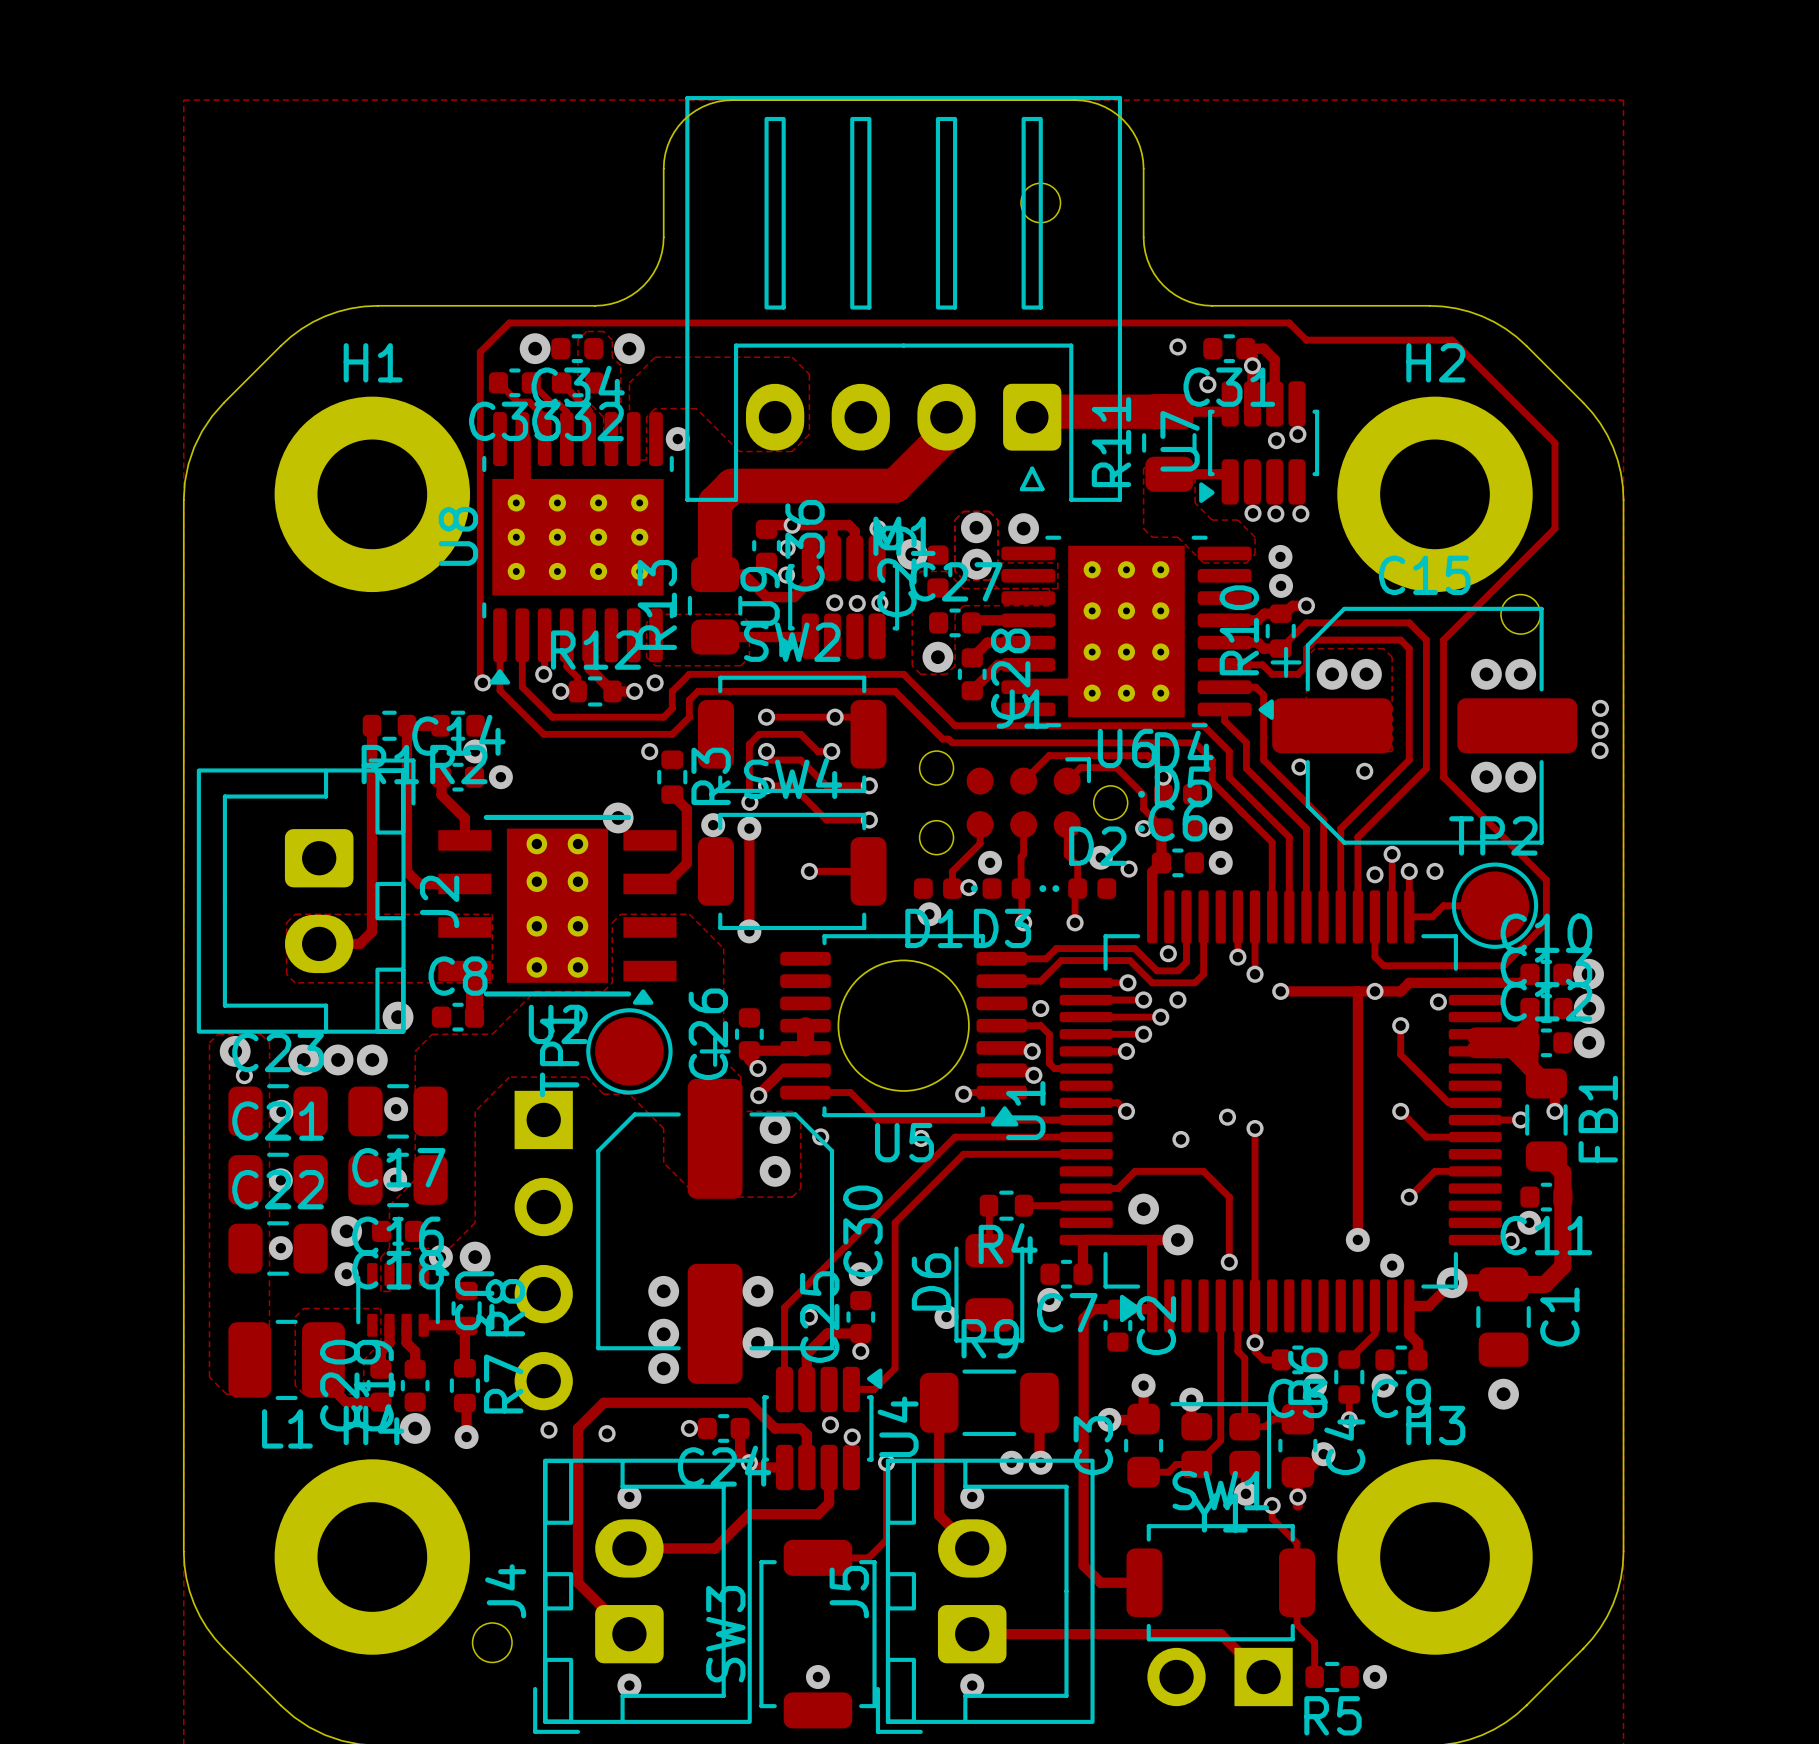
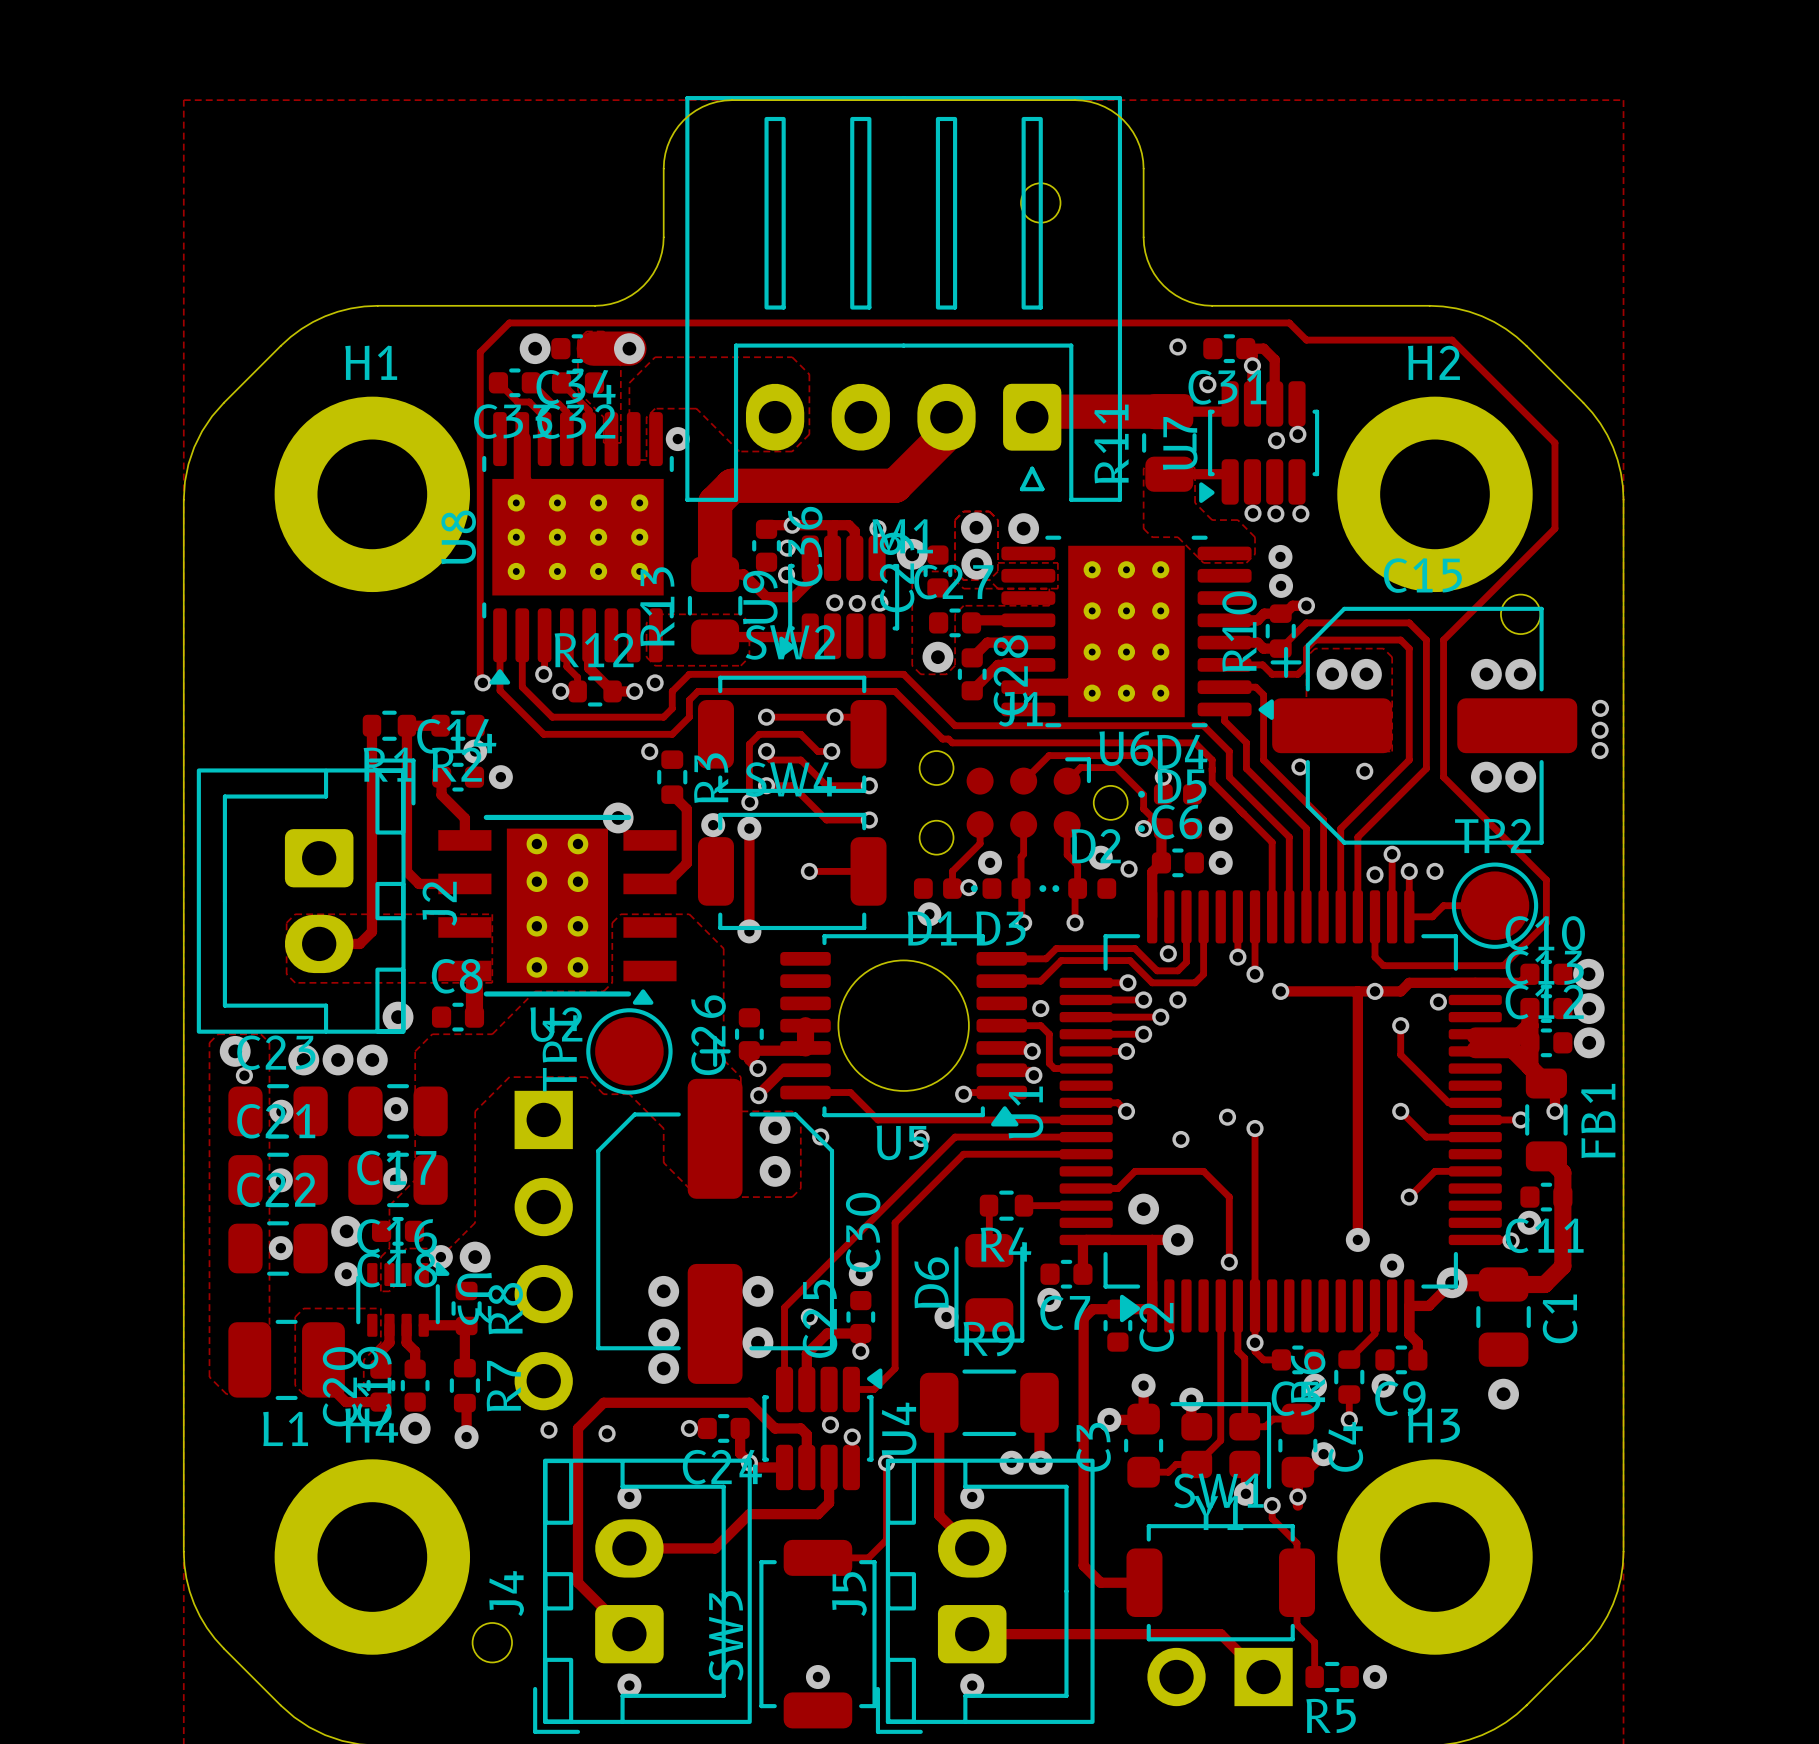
track: none -> (593, 348) (629, 348)

